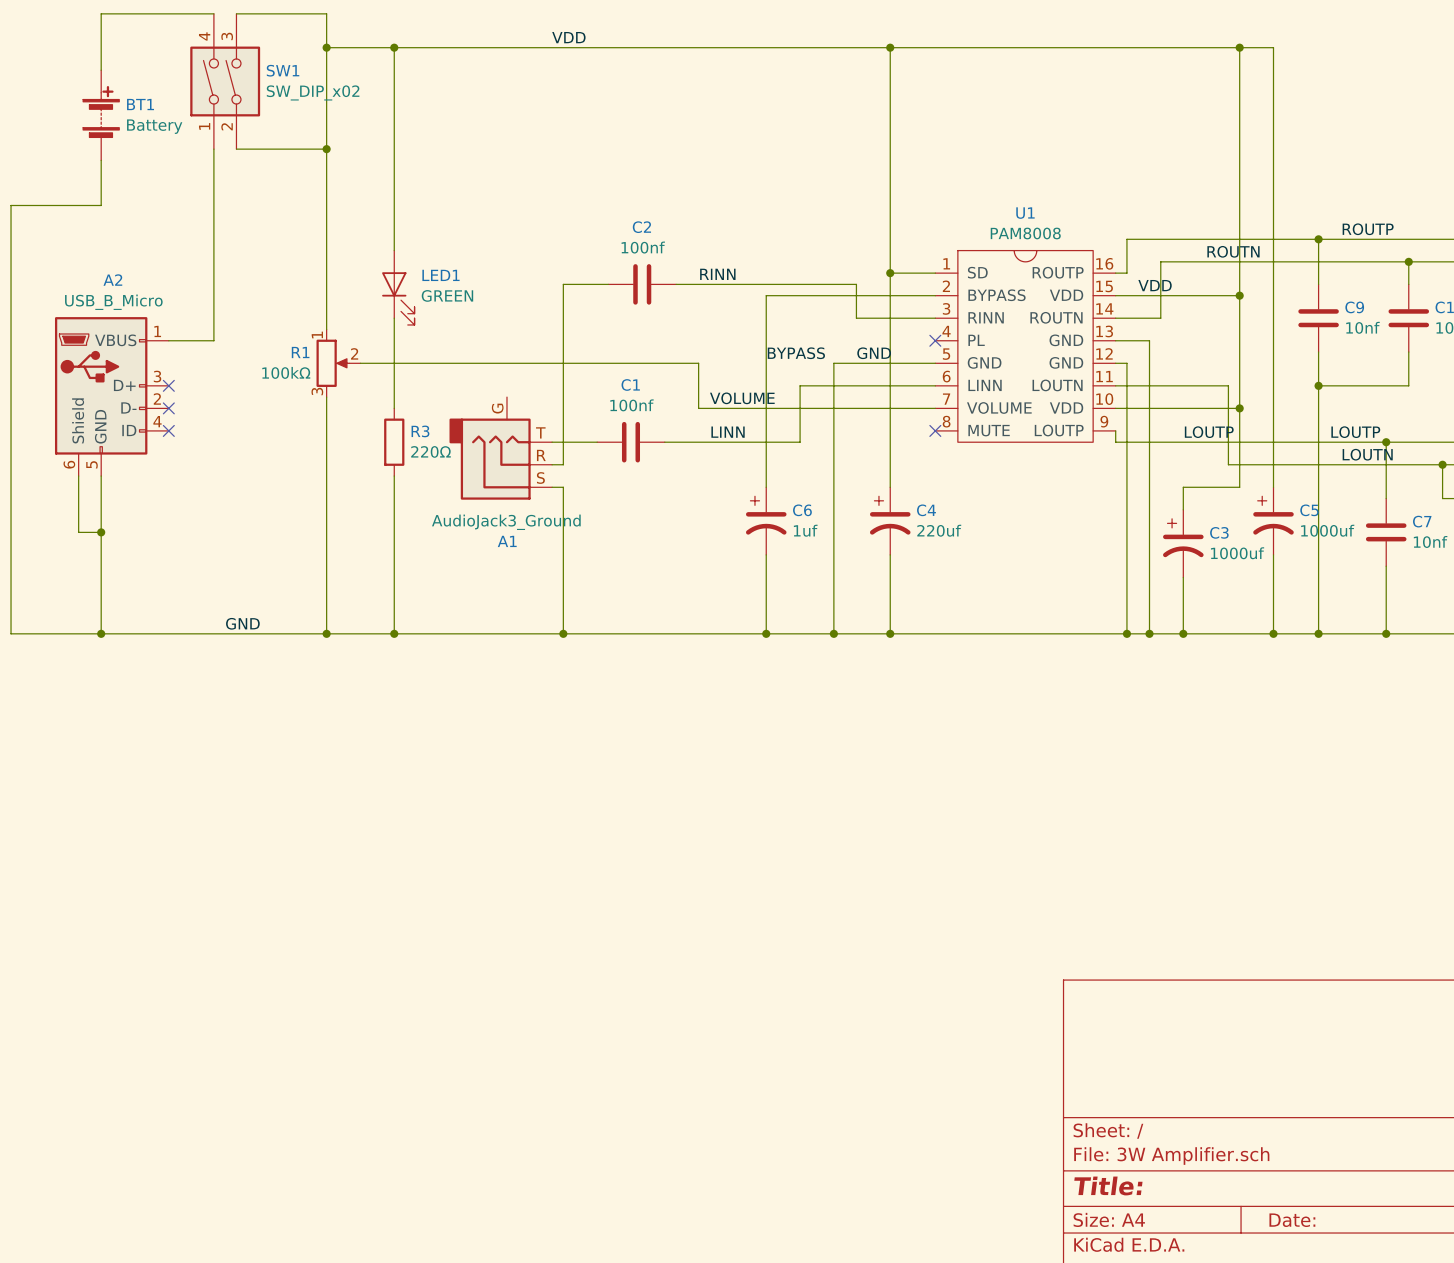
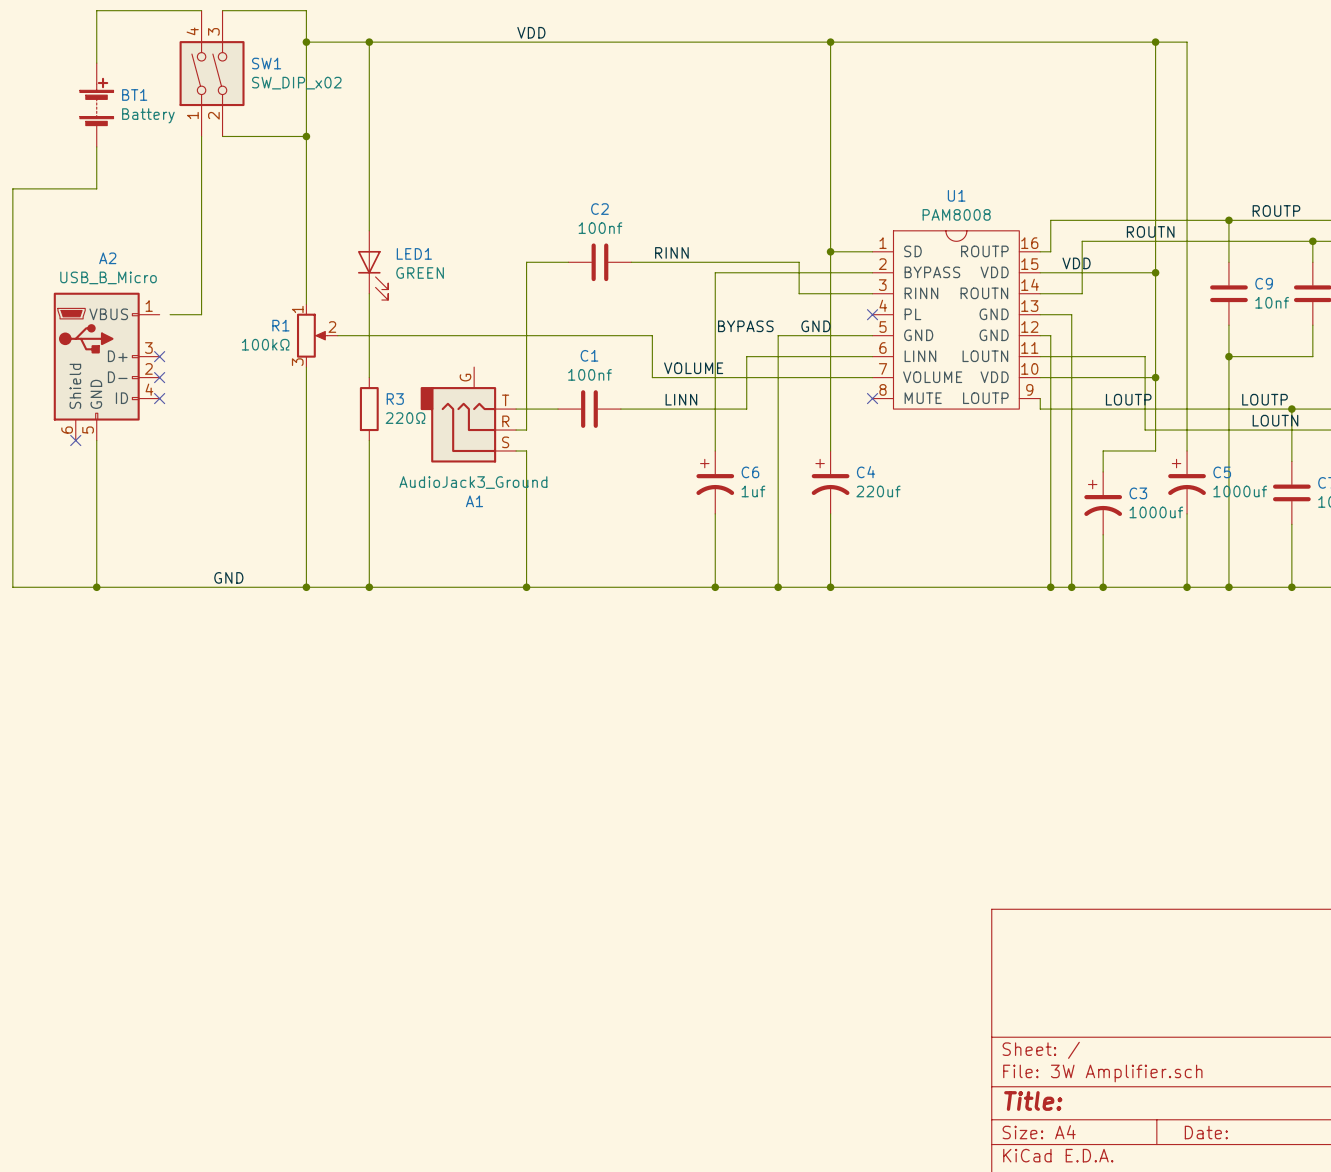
wire: (168, 340) (180, 340) -> none
wire: (78, 476) (78, 532) (101, 532) -> none
no-connect mark: none -> (75, 440)
junction: (101, 532) -> none

